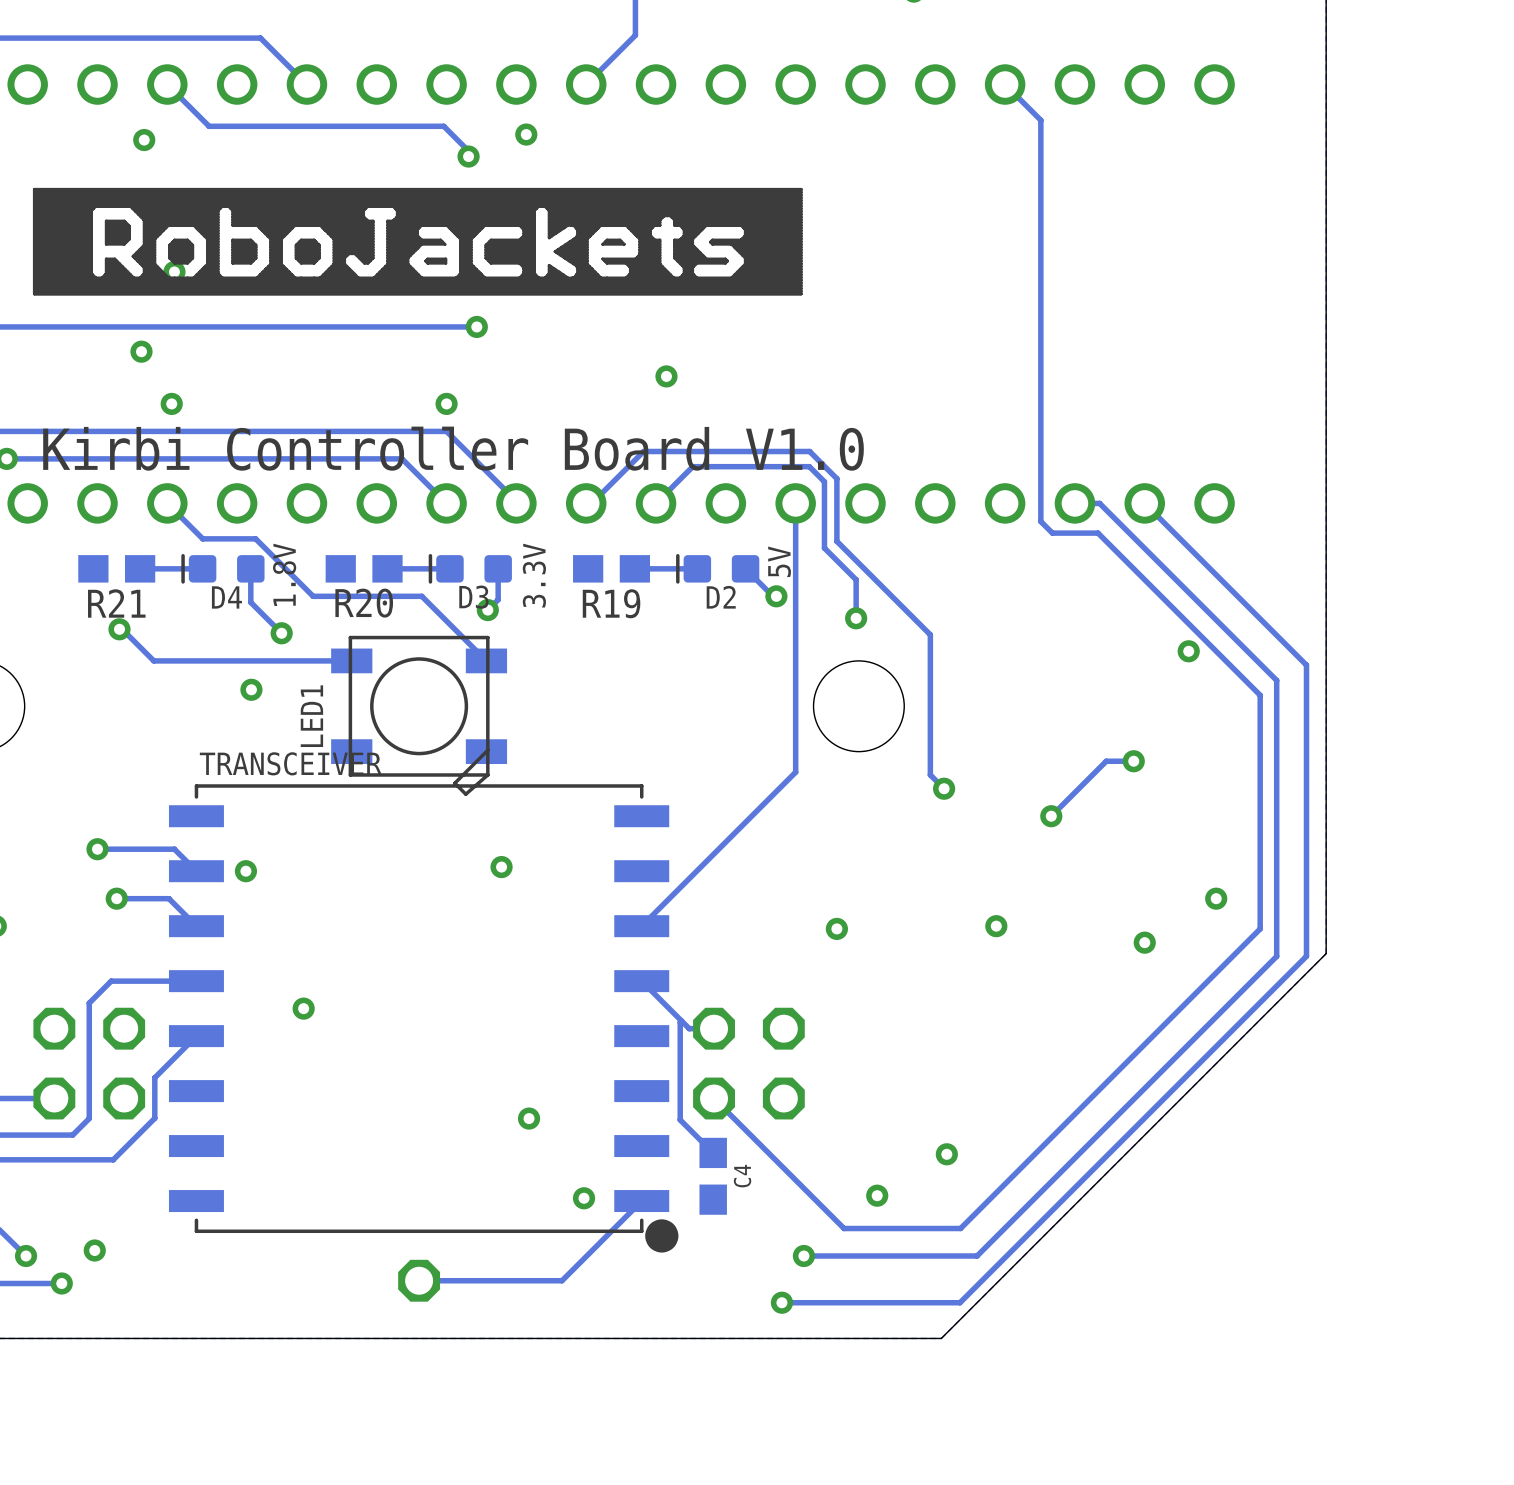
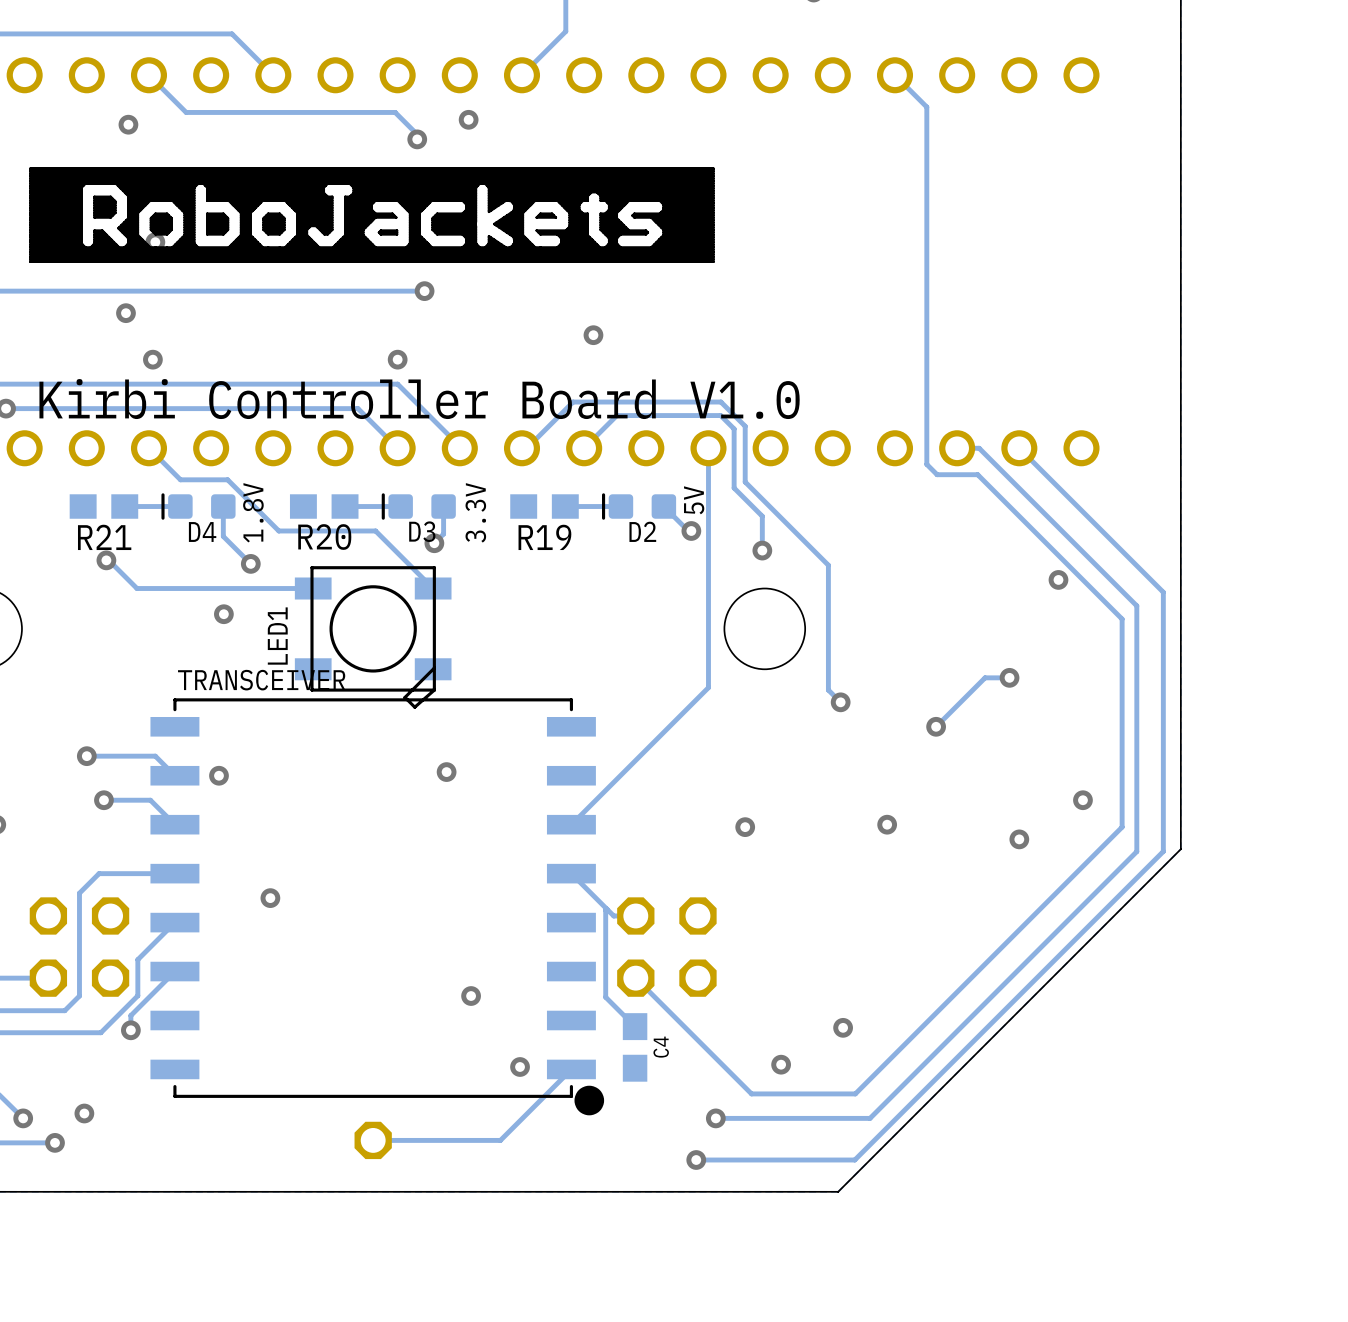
track: none -> (174, 971) (130, 1015) (130, 1030)
via: none -> (130, 1030)

